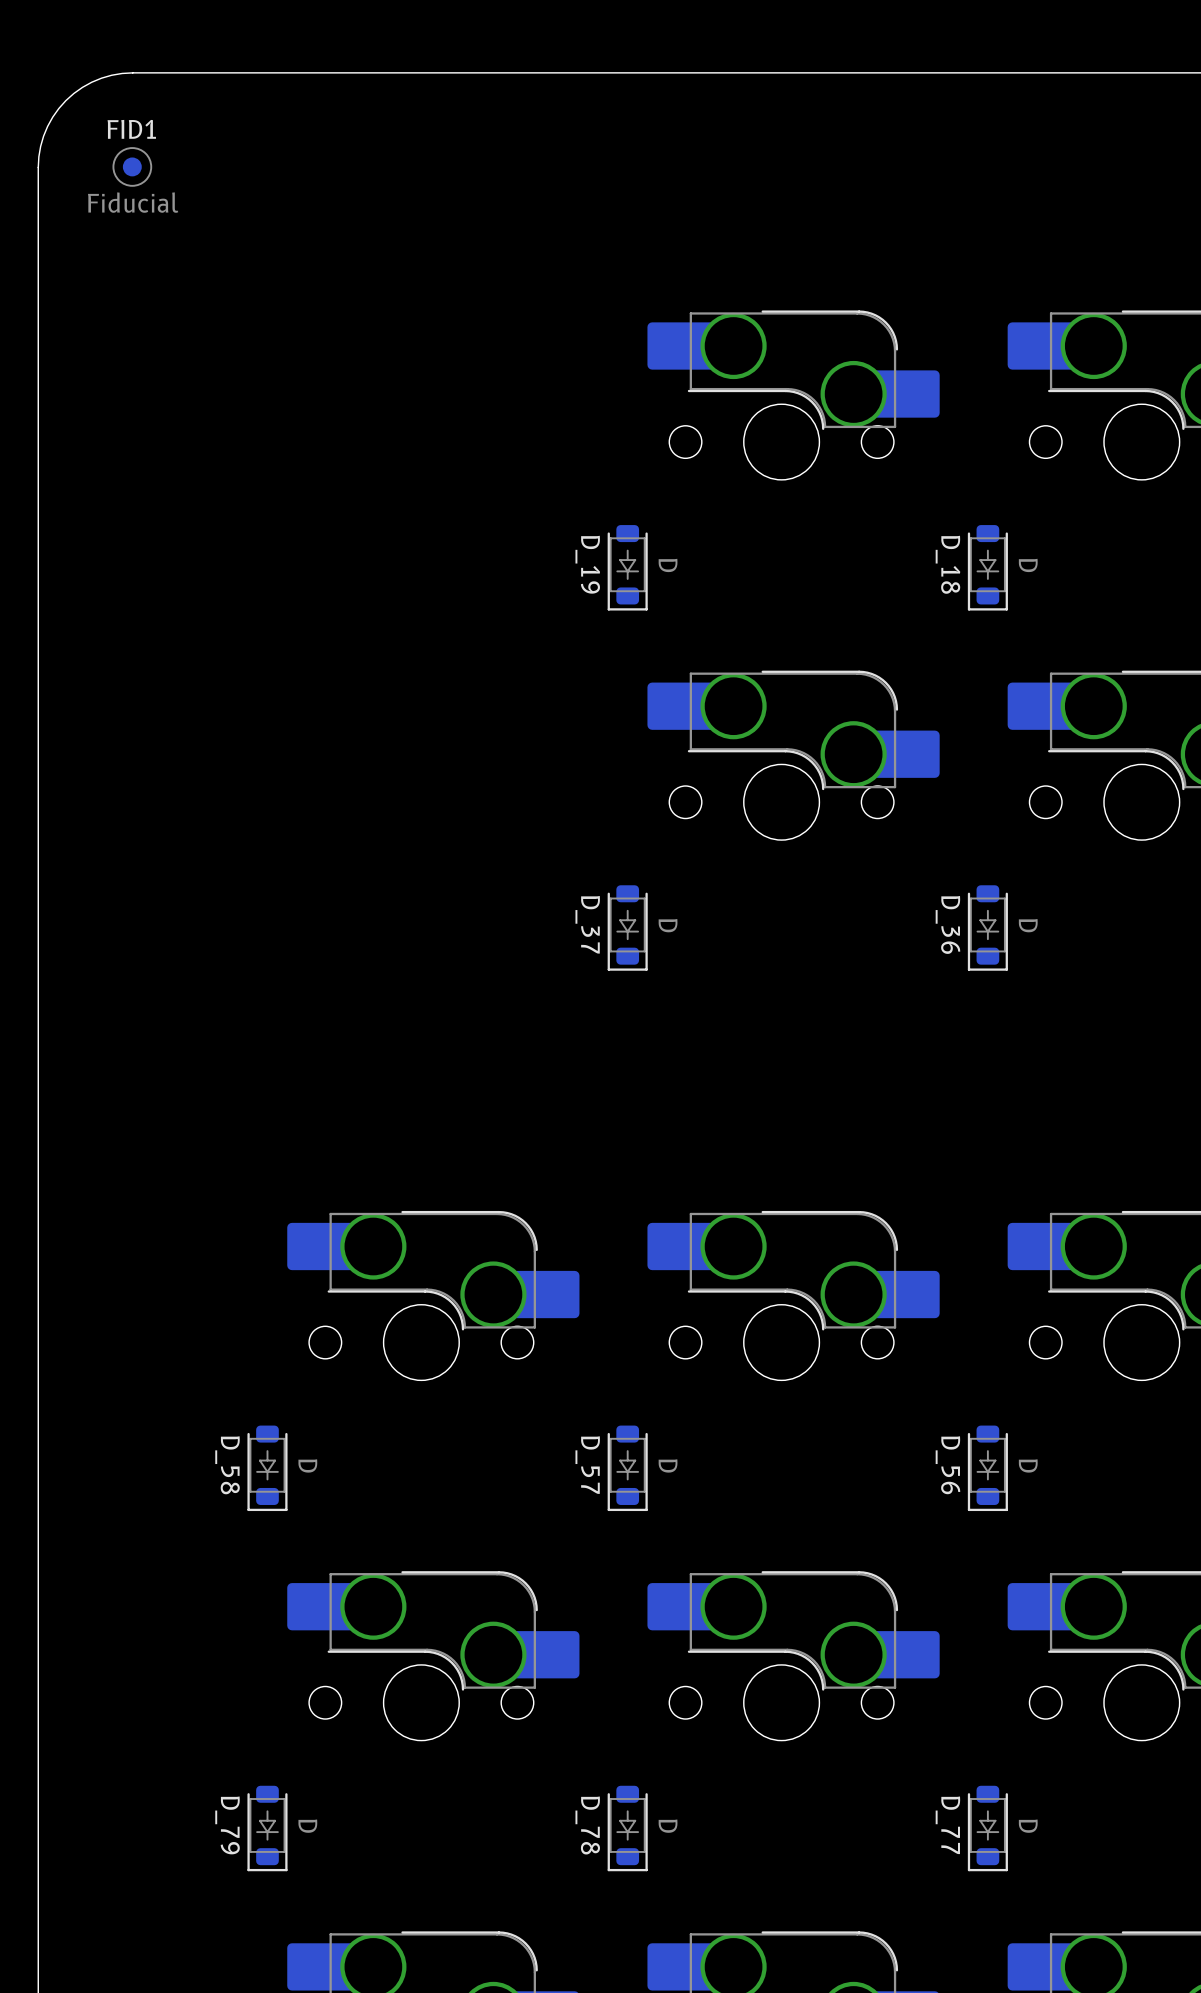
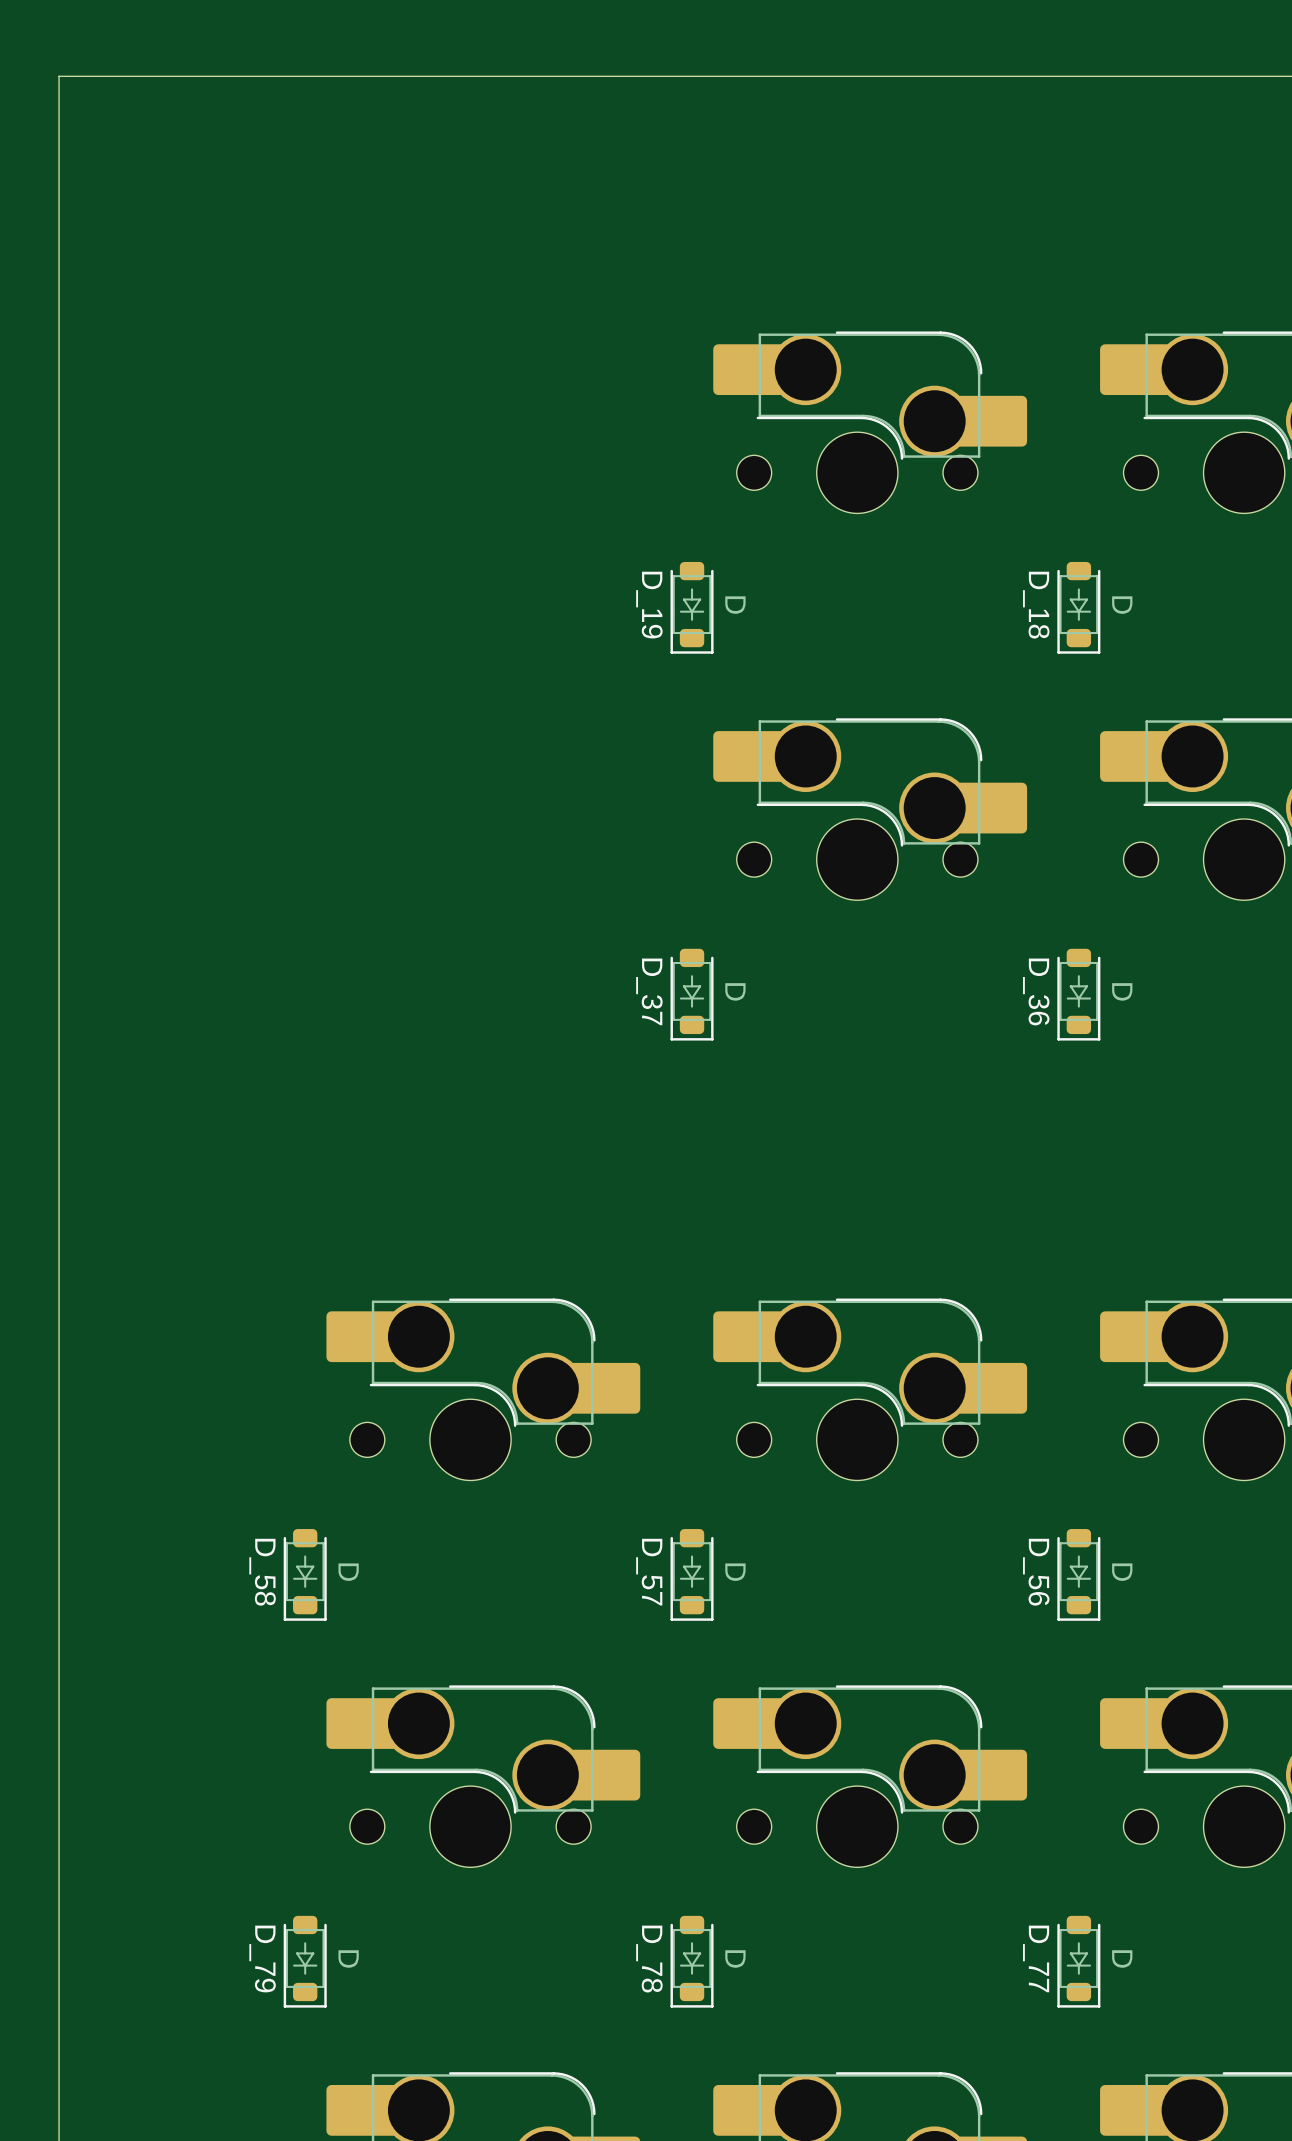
board edge: (132, 72) (111, 75) (91, 82) (65, 100) (52, 117) (43, 136) (38, 167) -> (160, 76) (59, 76) (59, 177)
FID1: Fiducial (132, 166) -> none

